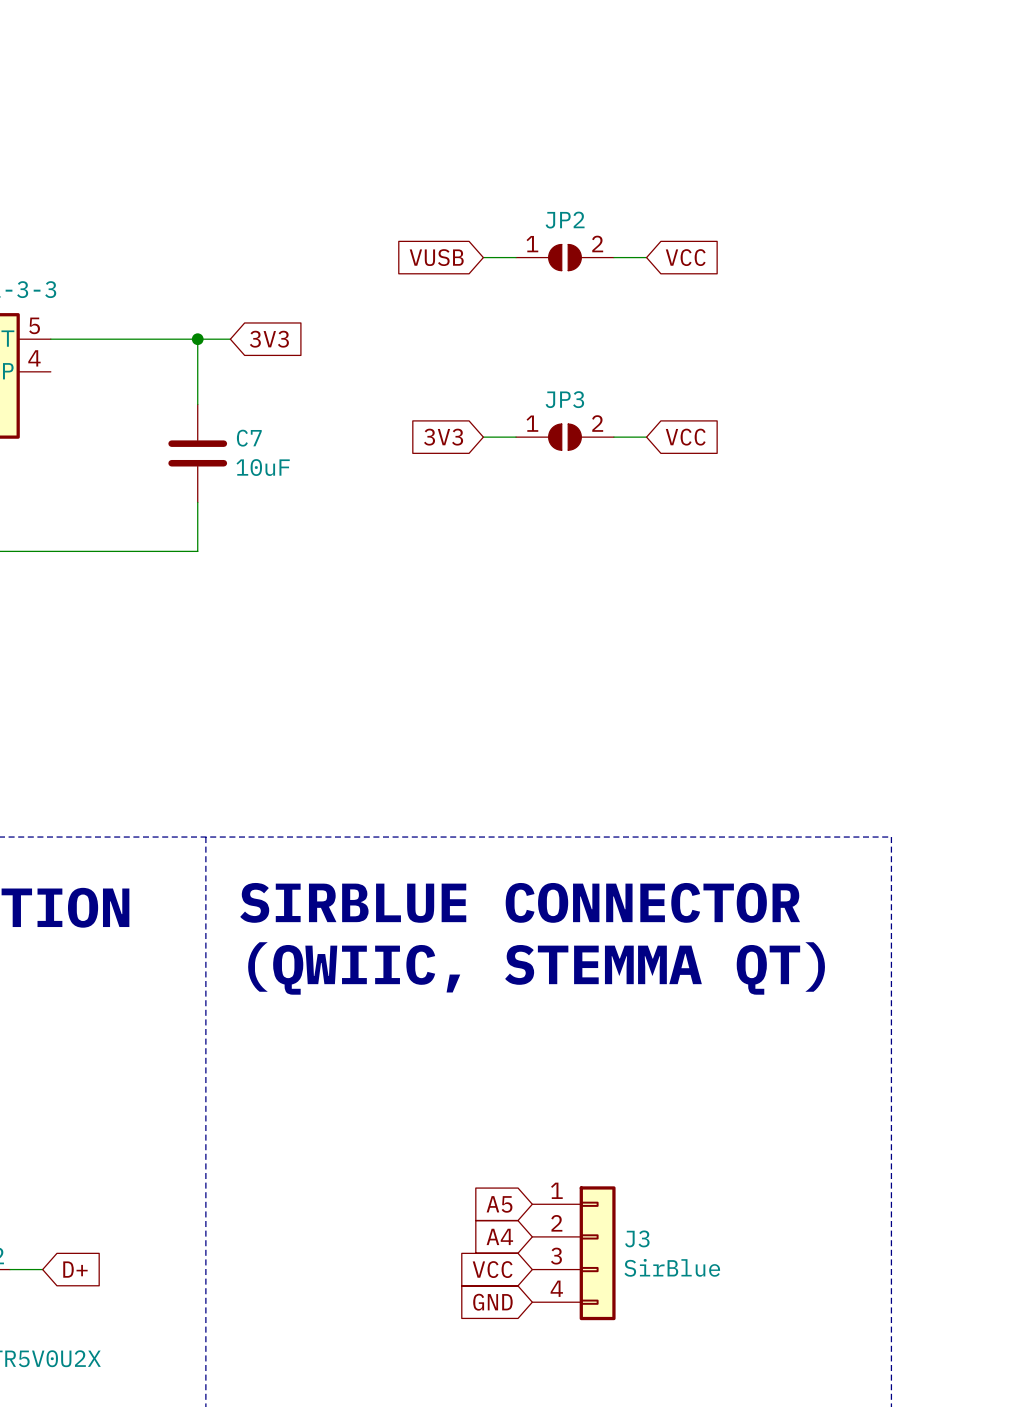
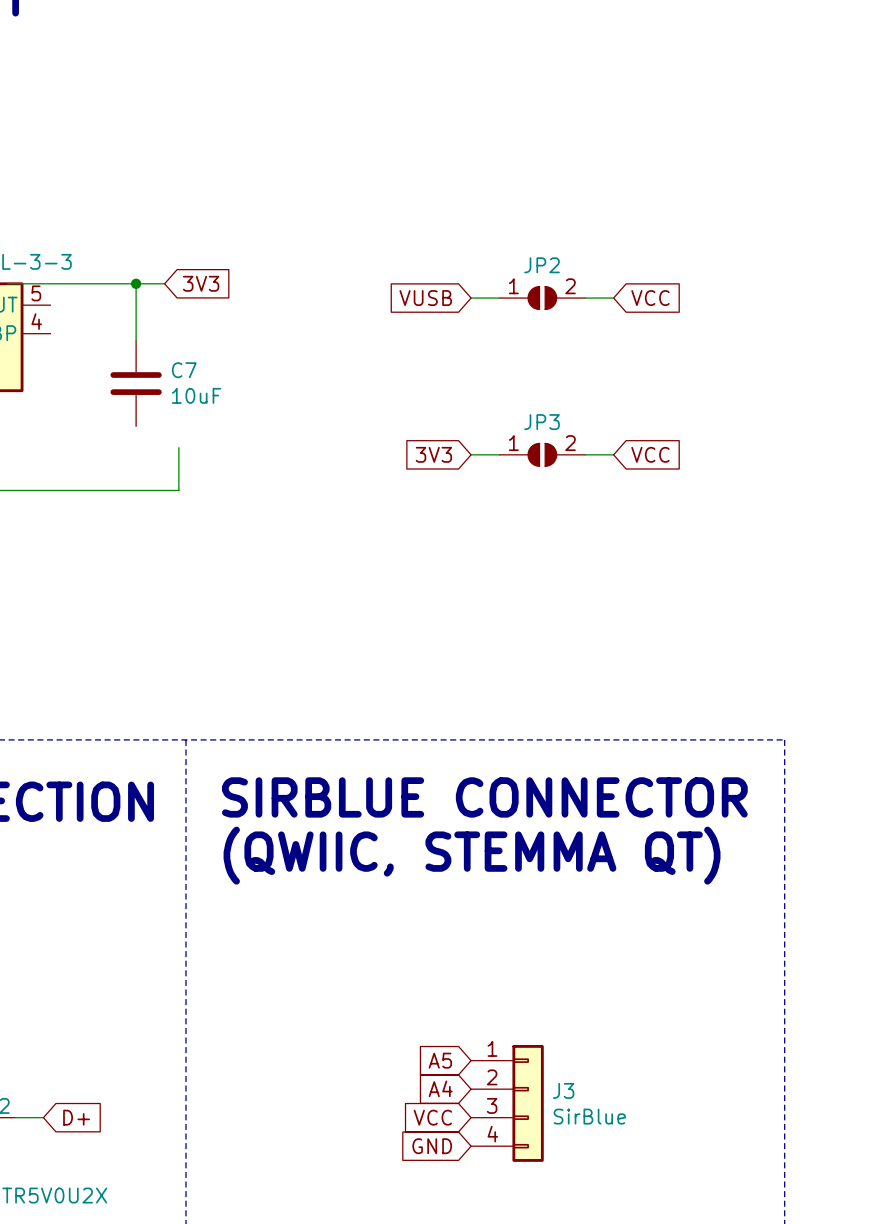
global label position: VUSB (436, 257) -> VUSB (425, 298)
wire: (483, 257) (516, 257) -> (471, 298) (499, 298)
JP2 position: (564, 257) -> (542, 298)
wire: (613, 257) (646, 257) -> (585, 298) (613, 298)
global label: VCC (685, 257) -> none
global label: none -> VCC (650, 298)
wire: (50, 339) (230, 339) -> (7, 283) (164, 283)
wire: (197, 339) (197, 404) -> (136, 283) (136, 340)
junction position: (197, 339) -> (136, 283)
global label position: 3V3 (269, 339) -> 3V3 (201, 283)
global label position: 3V3 (443, 437) -> 3V3 (433, 454)
wire: (483, 437) (516, 437) -> (471, 454) (499, 454)
JP3 position: (564, 437) -> (542, 454)
wire: (613, 437) (646, 437) -> (585, 454) (613, 454)
global label: VCC (685, 437) -> none
C7 position: (197, 453) -> (136, 383)
global label: none -> VCC (650, 454)

